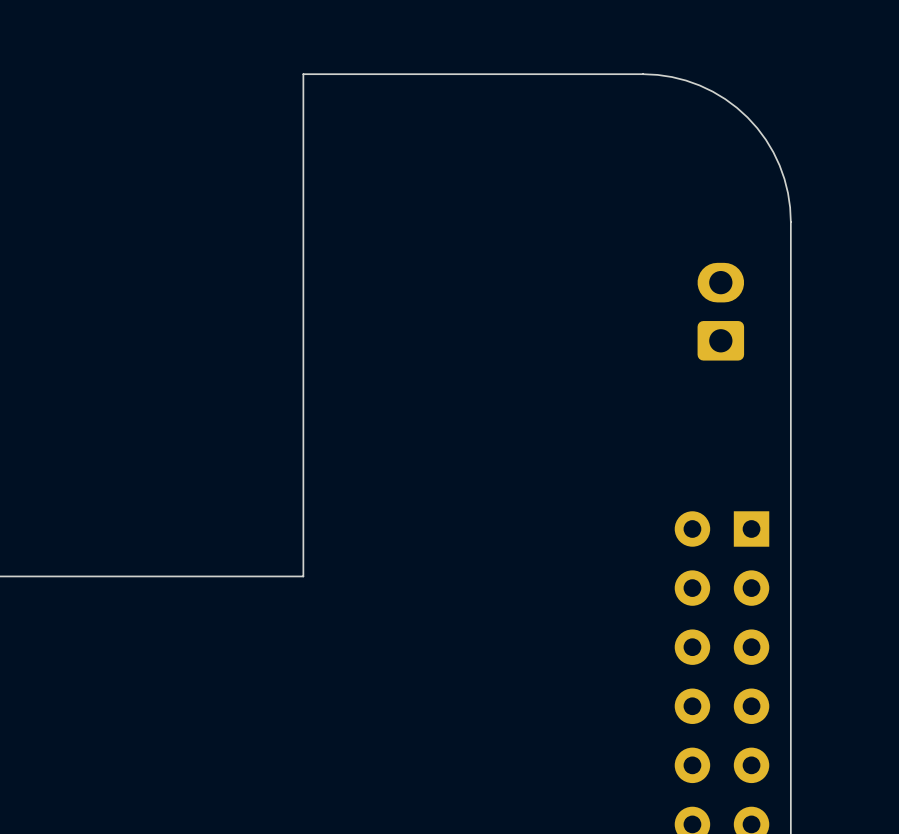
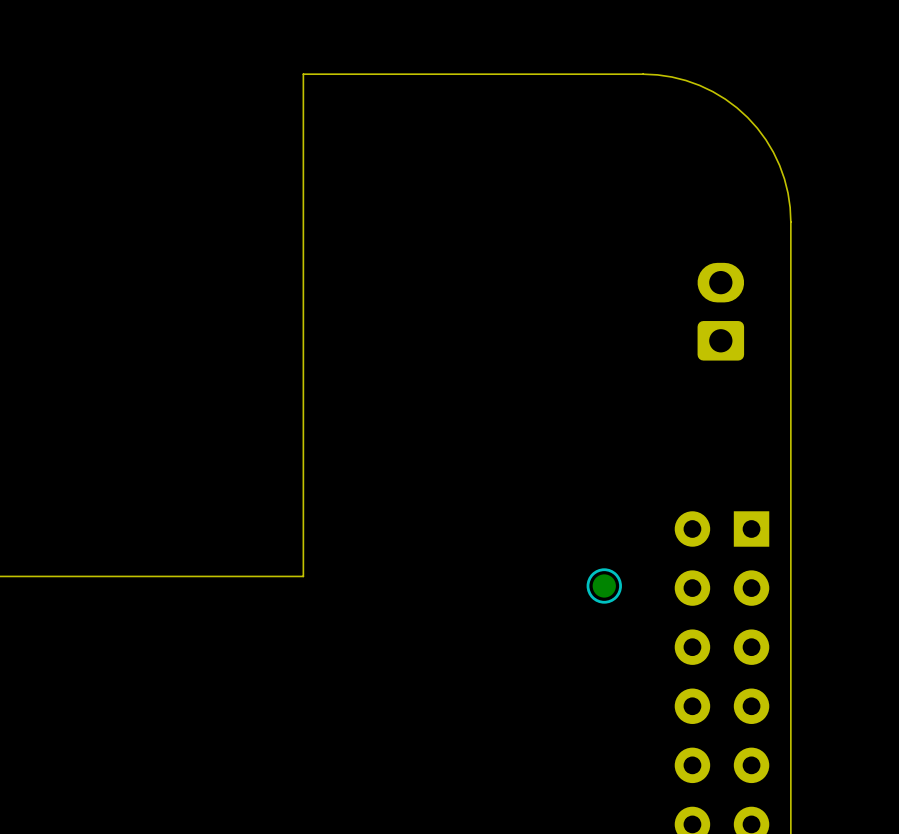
part: none -> (604, 585)

